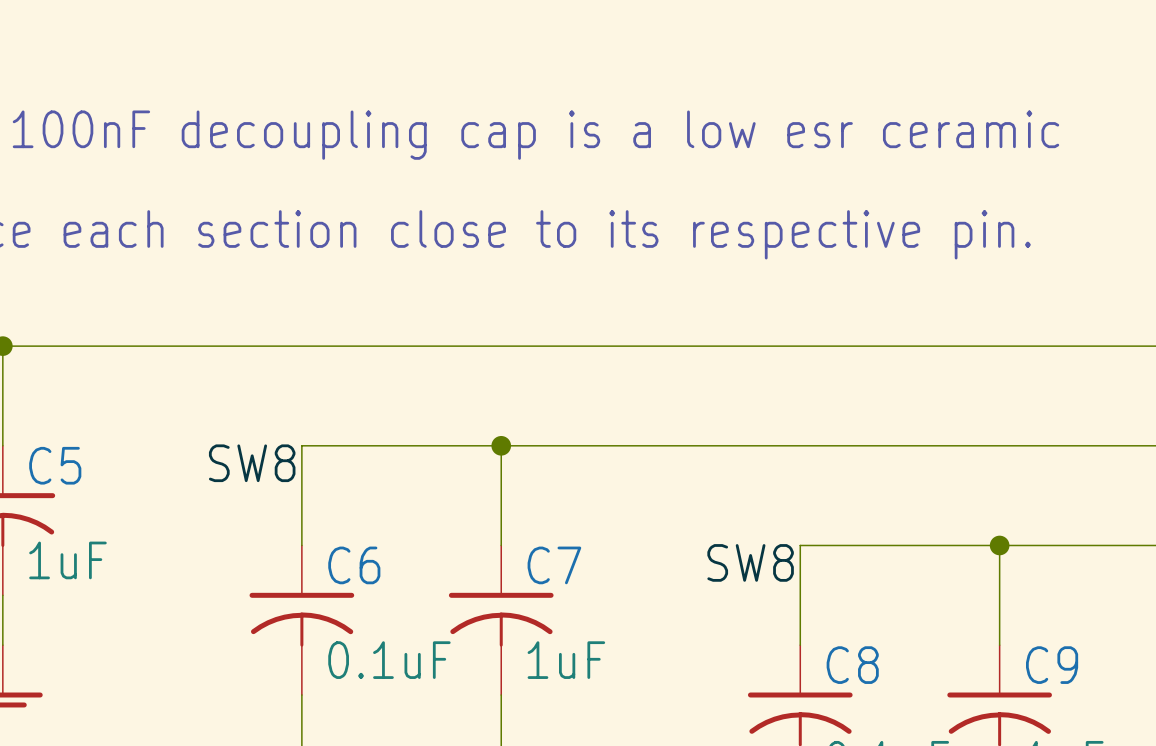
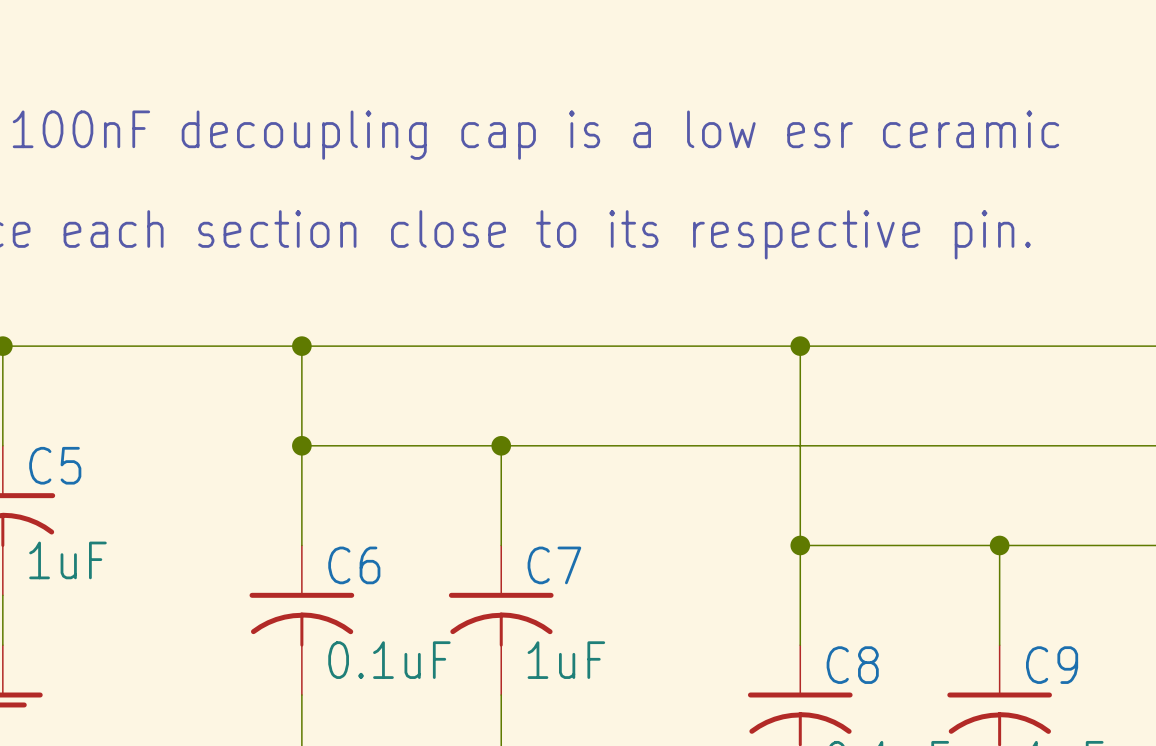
wire: none -> (301, 346) (301, 445)
junction: none -> (301, 346)
wire: none -> (800, 346) (800, 545)
junction: none -> (800, 346)
junction: none -> (301, 445)
label: SW8 (252, 463) -> none
junction: none -> (800, 545)
label: SW8 (750, 562) -> none

